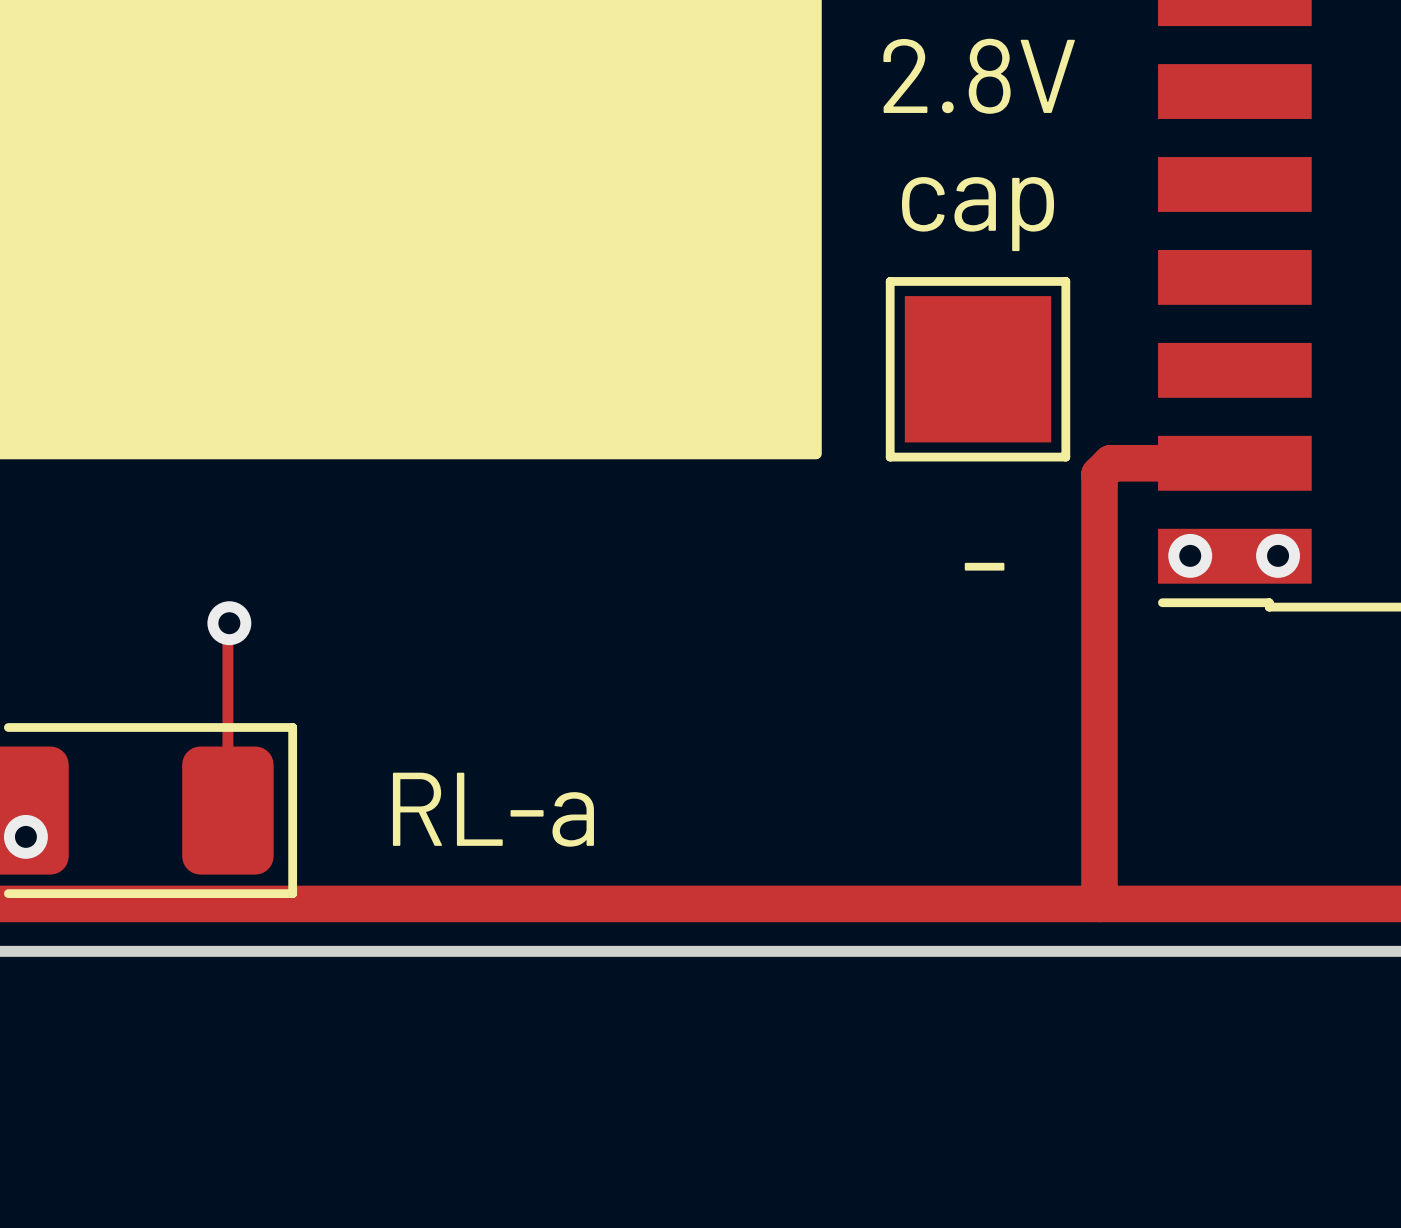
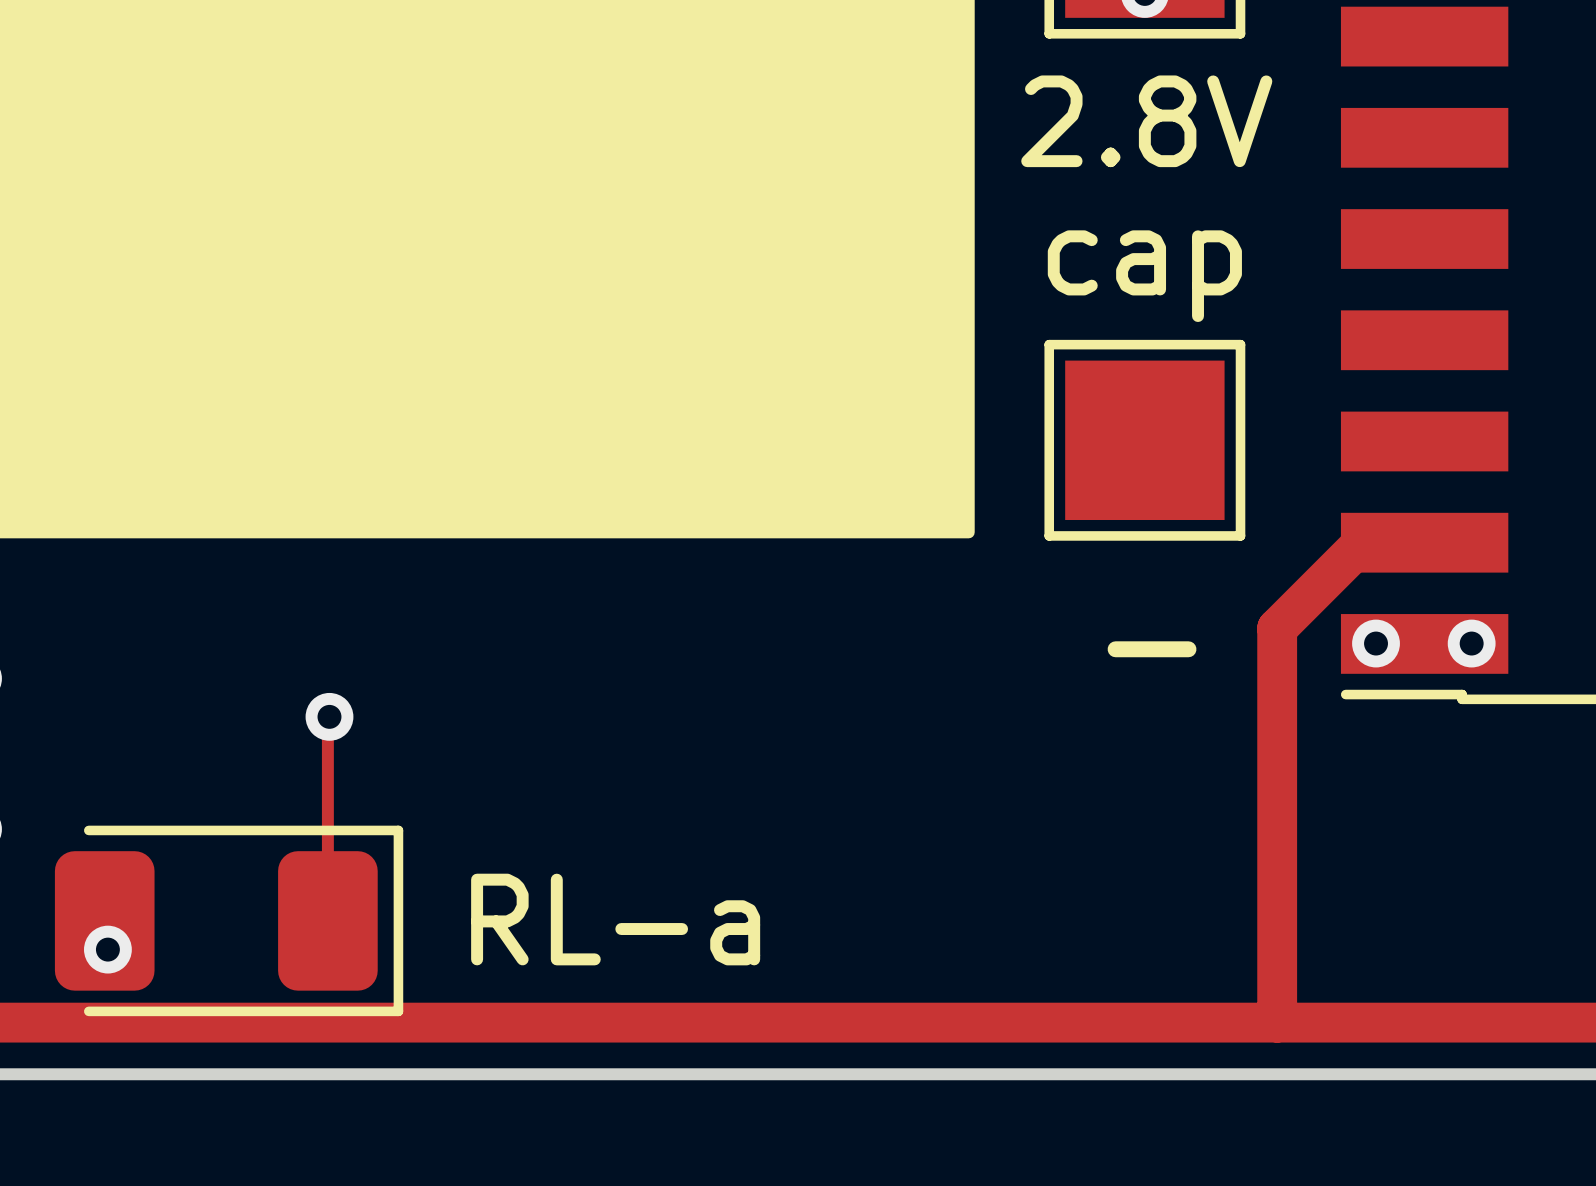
track: (1178, 463) (1110, 463) (1099, 474) (1099, 541) -> (1362, 542) (1277, 628)

